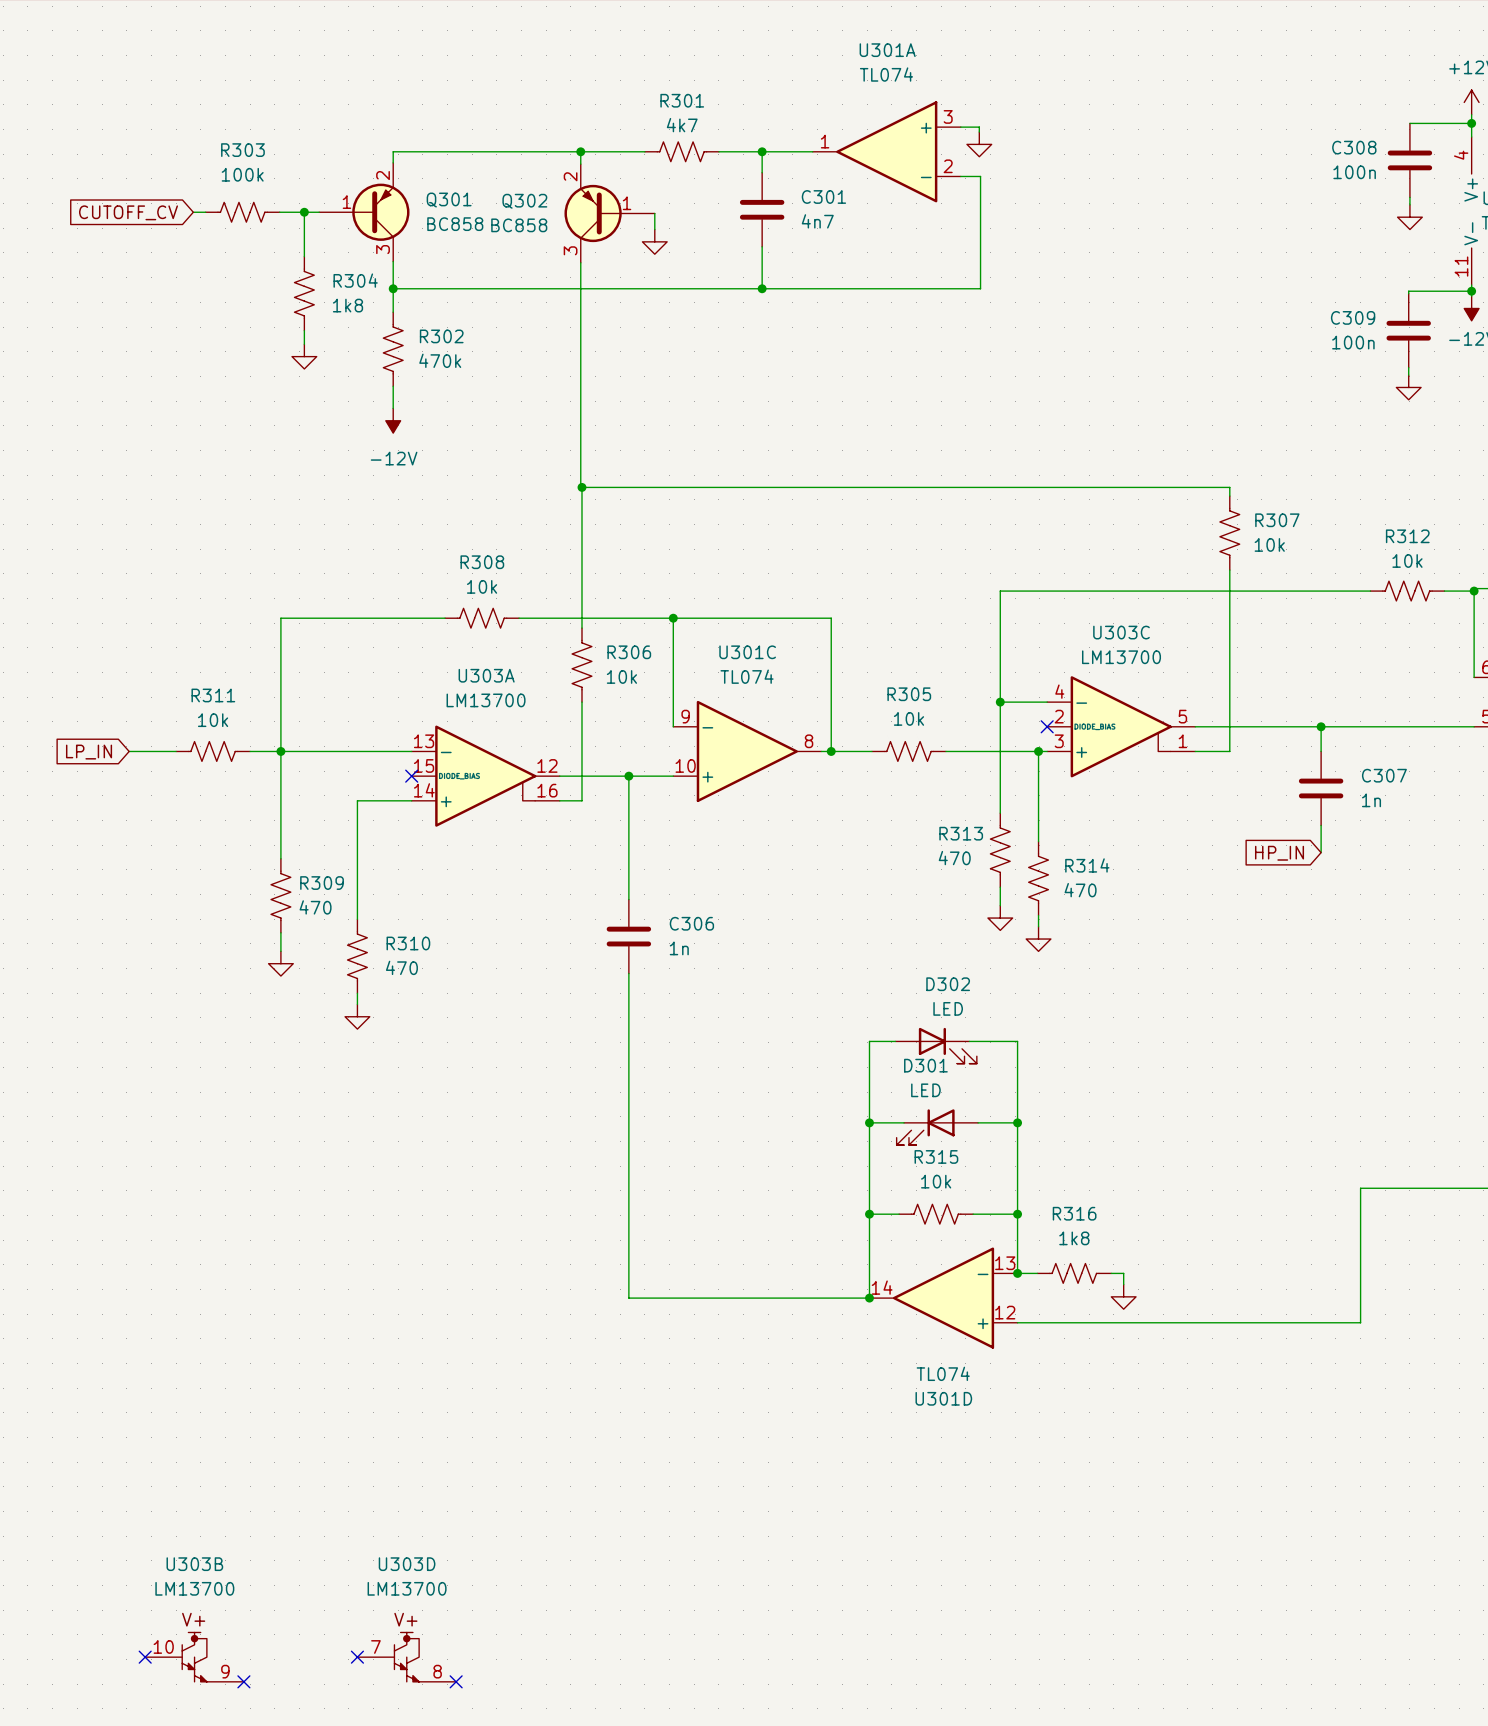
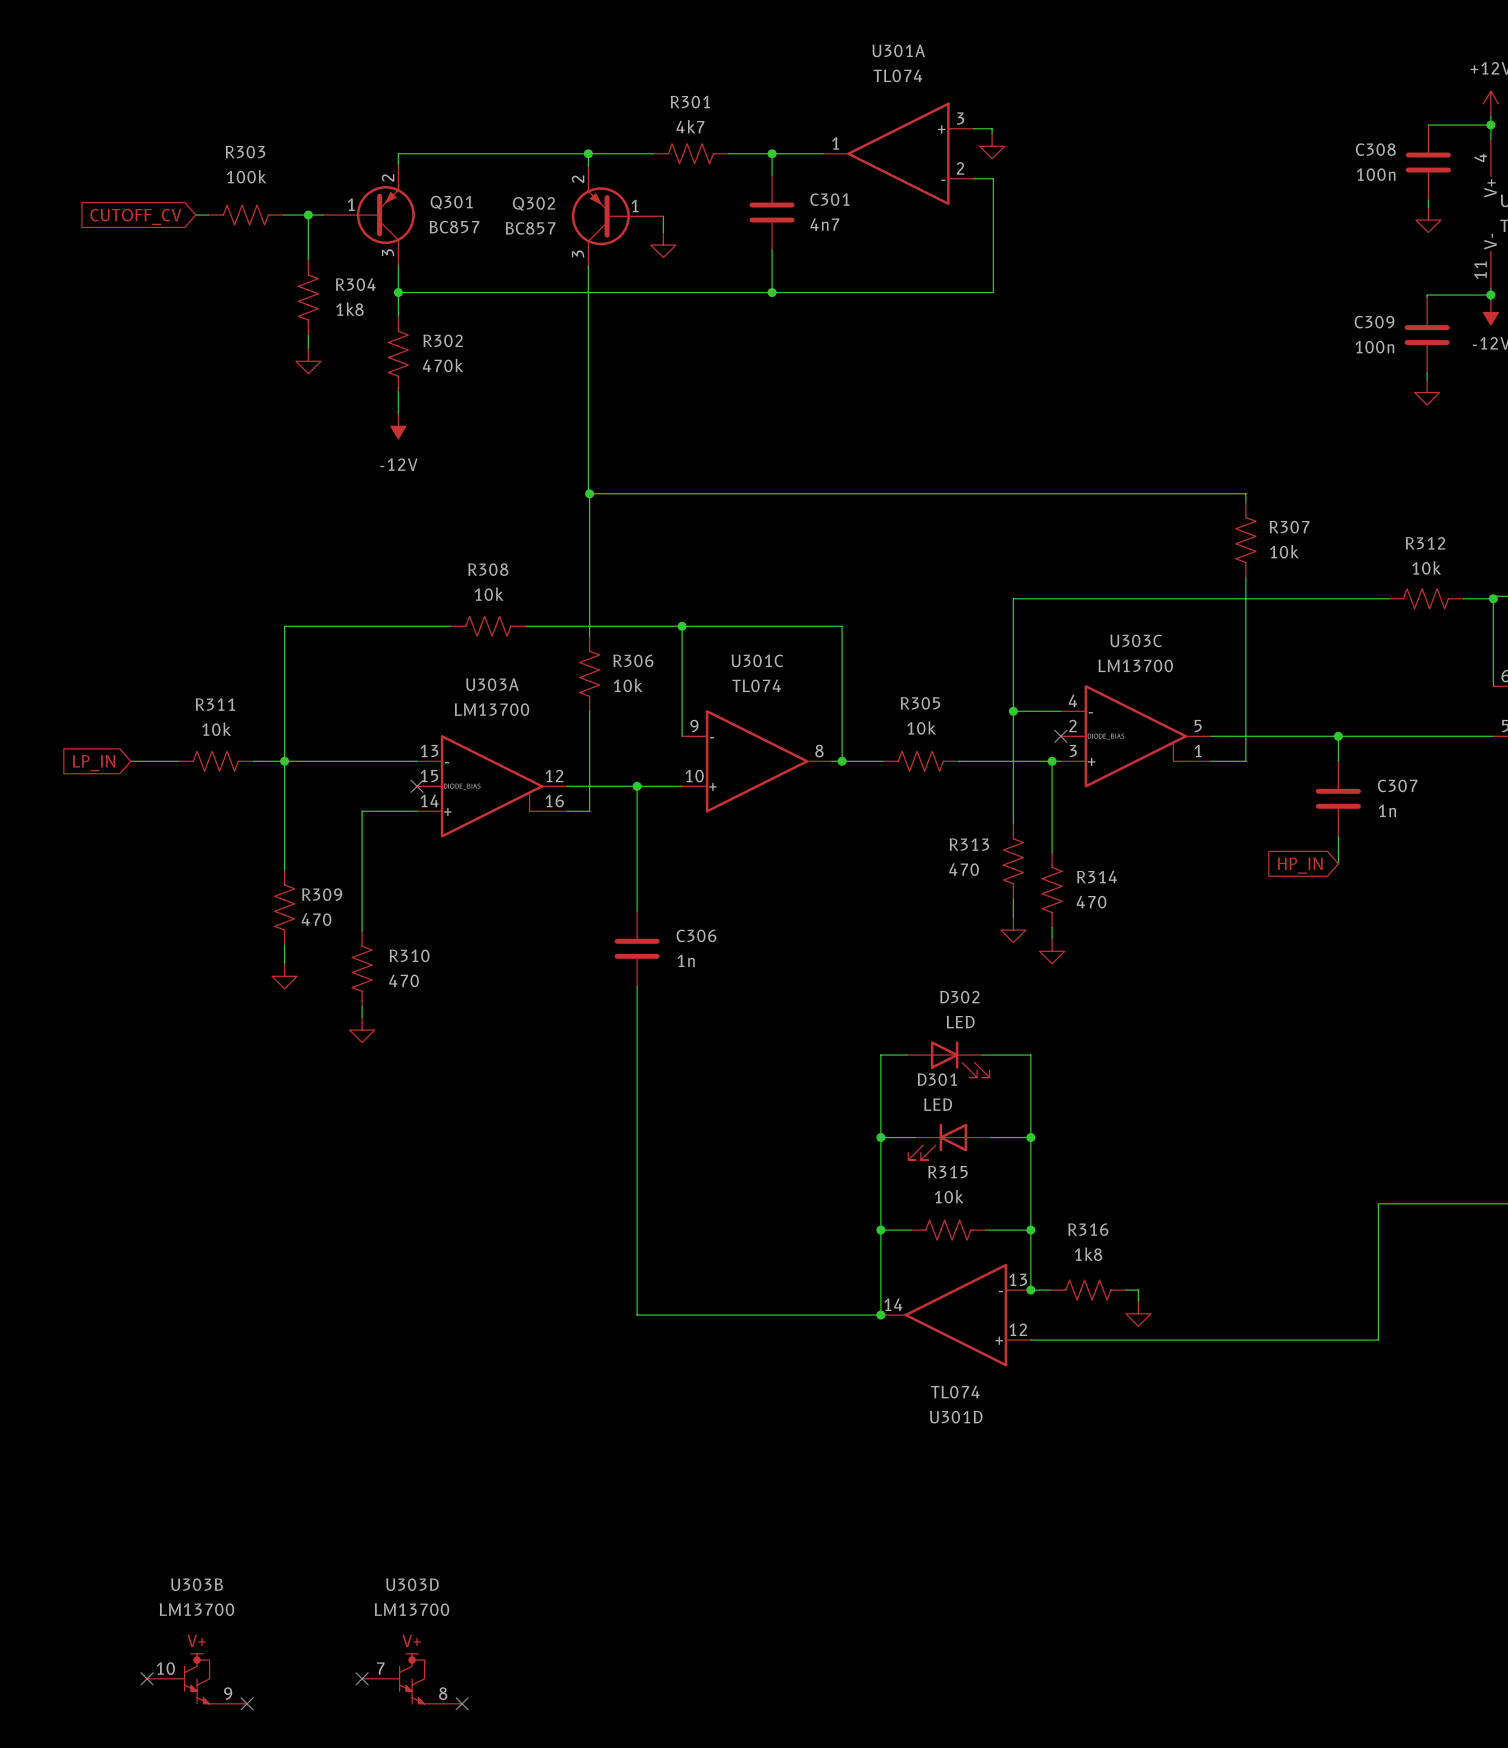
Q301 value: BC858 (455, 224) -> BC857 (454, 227)
Q302 value: BC858 (519, 225) -> BC857 (530, 228)

